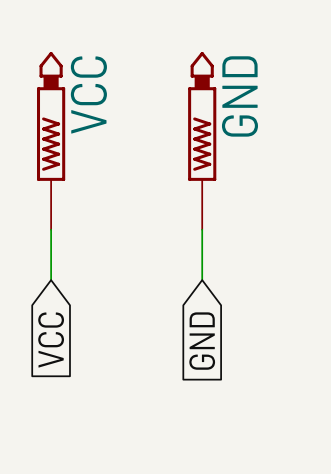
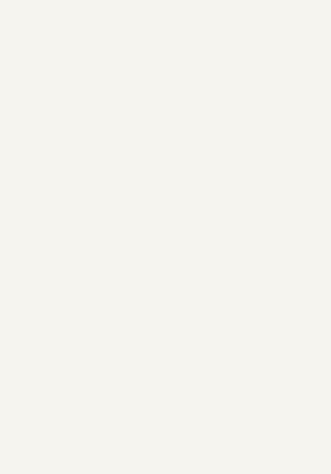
VCC: (51, 140) -> none
GND: (202, 140) -> none
wire: (51, 229) (51, 280) -> none
wire: (202, 229) (202, 280) -> none
global label: VCC (51, 340) -> none
global label: GND (202, 341) -> none

